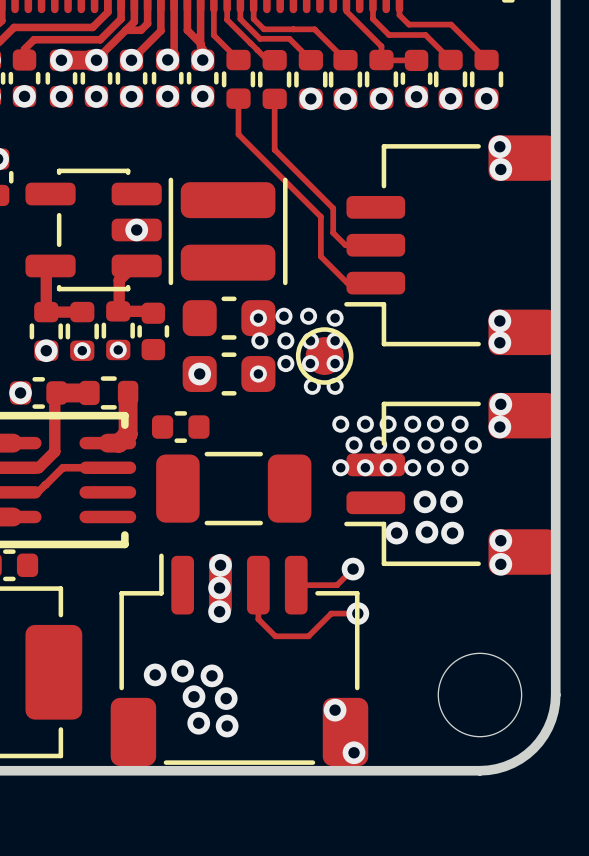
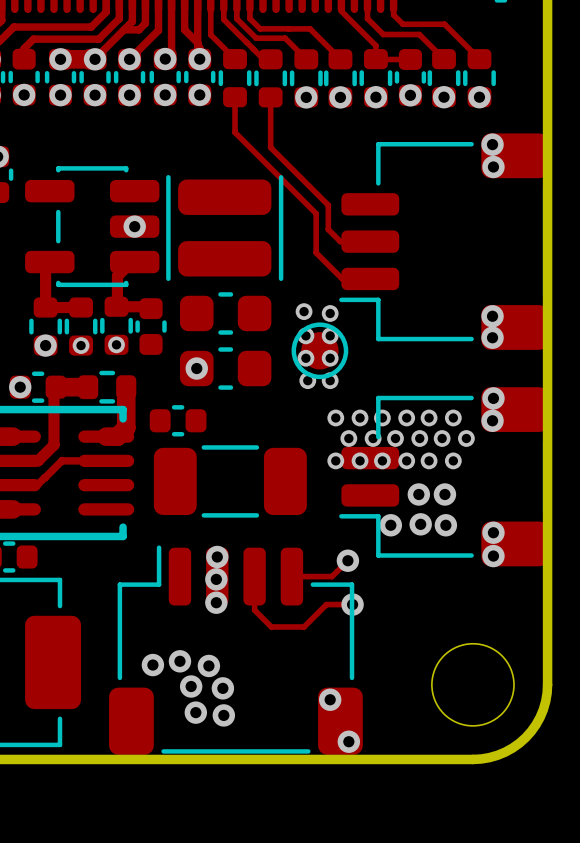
via: (283, 316) -> none
via: (258, 318) -> none
via: (259, 340) -> none
via: (285, 340) -> none
via: (285, 363) -> none
via: (258, 374) -> none

